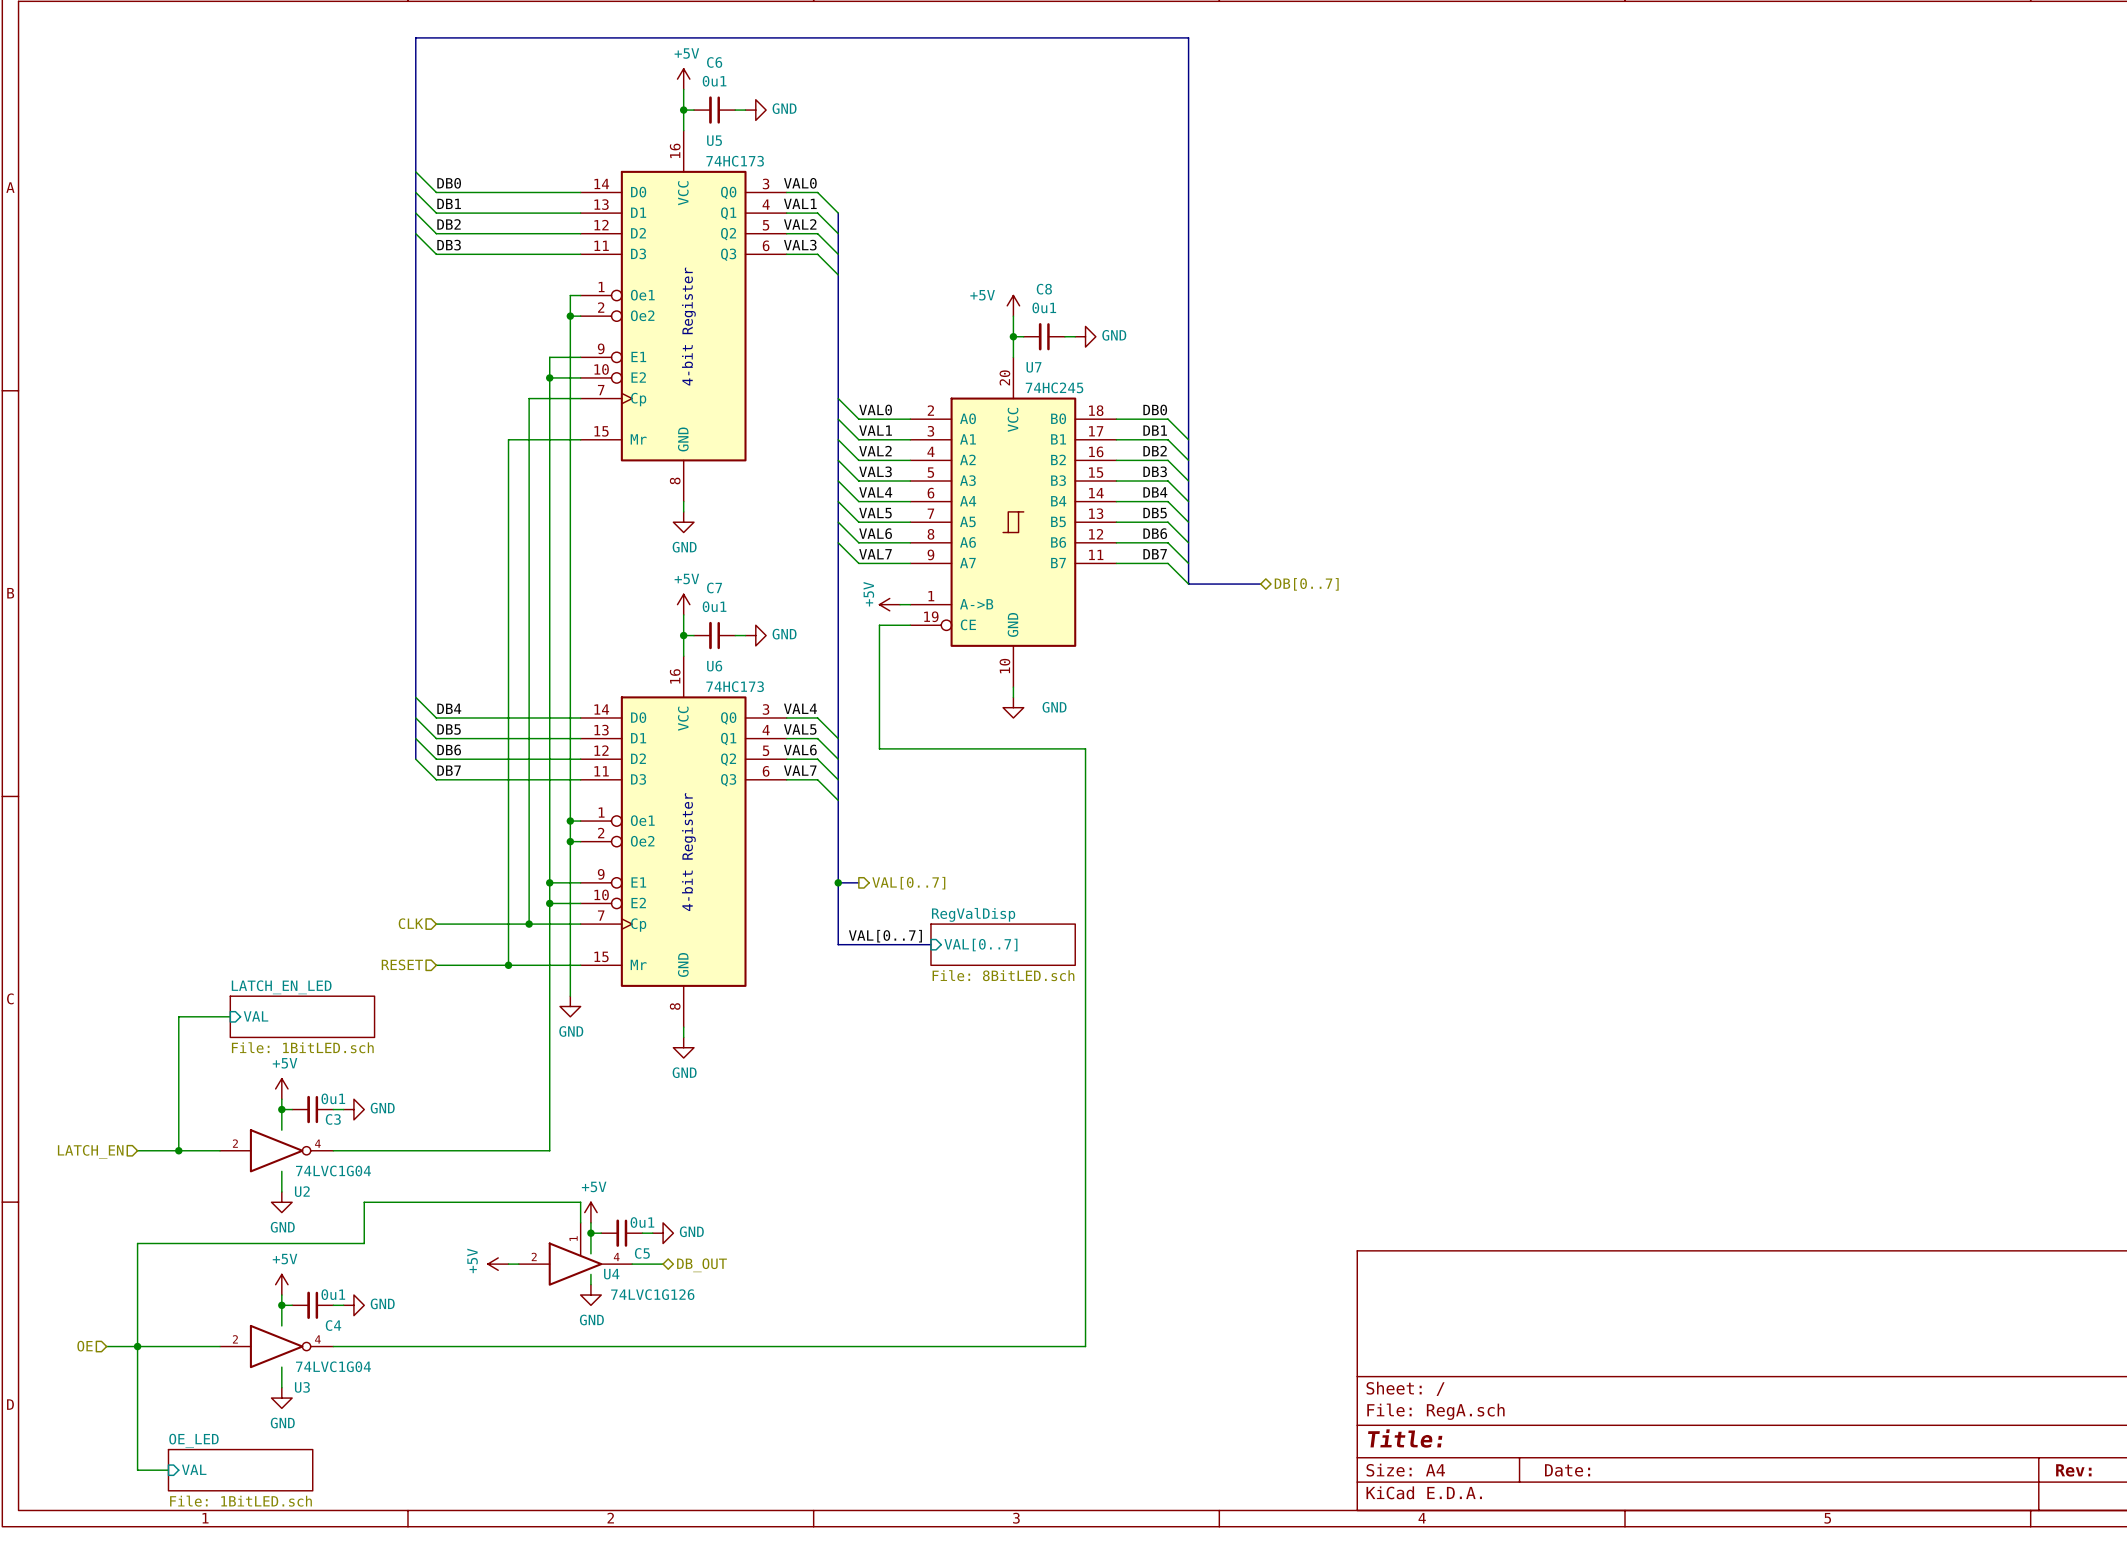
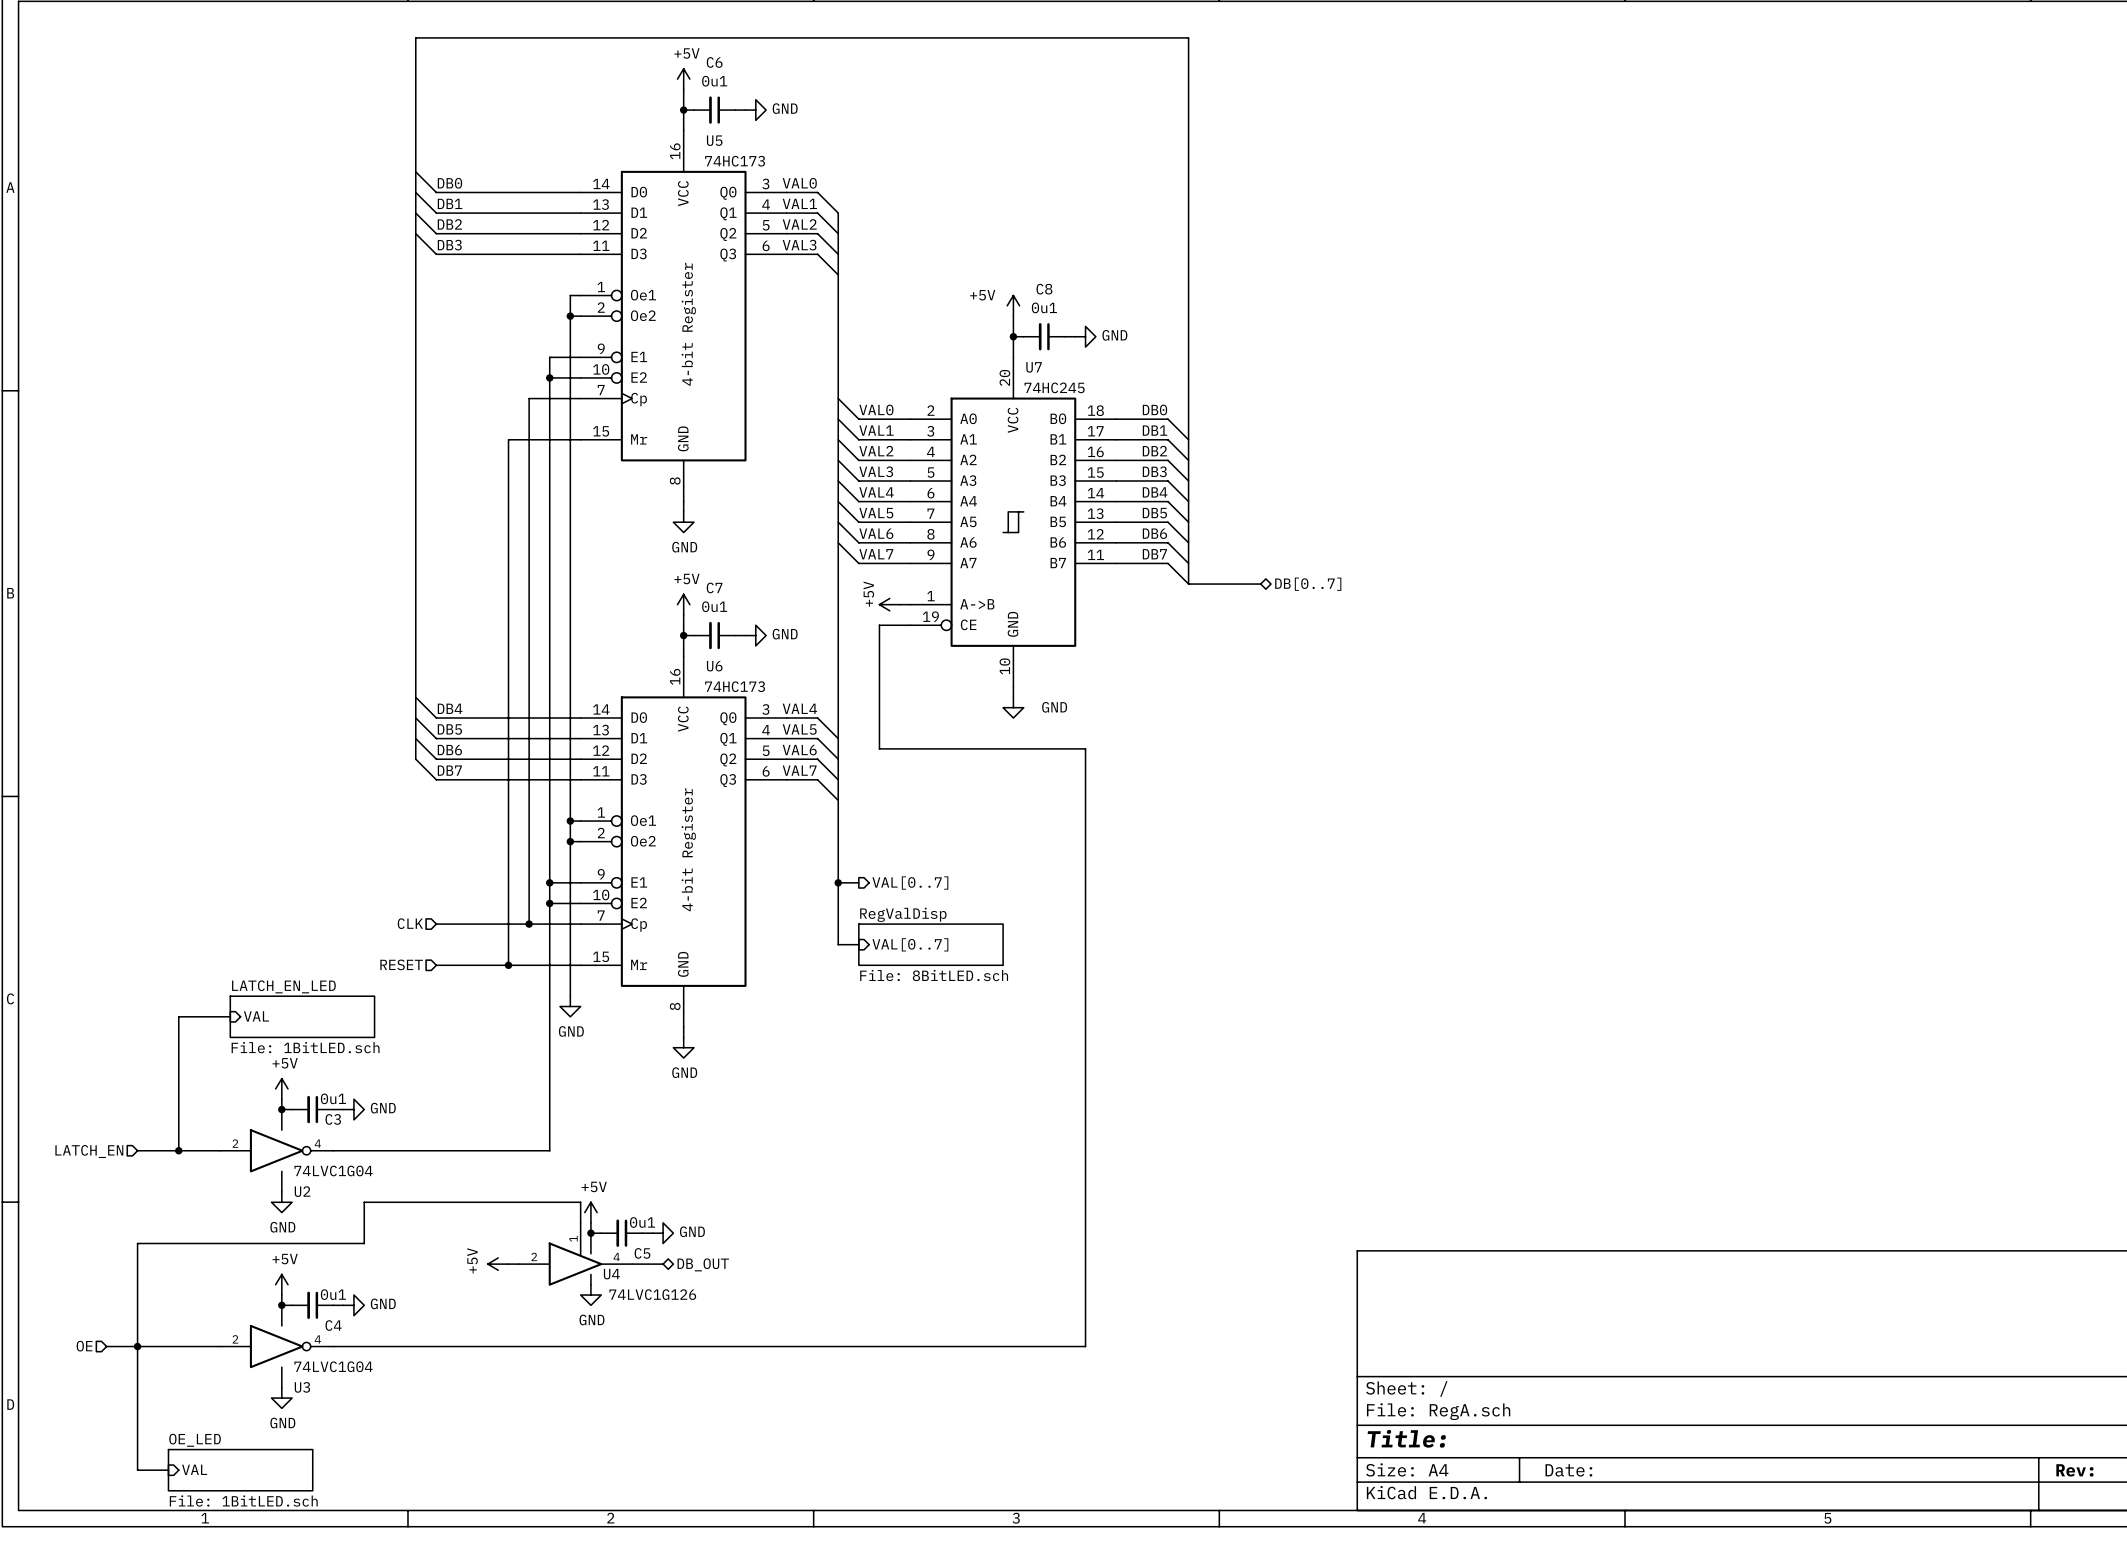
label: VAL[0..7] (885, 936) -> none
bus: (858, 944) (930, 944) -> none
sheet RegValDisp position: (1003, 944) -> (930, 944)
sheet pin position: VAL[0..7] (980, 945) -> VAL[0..7] (910, 944)

